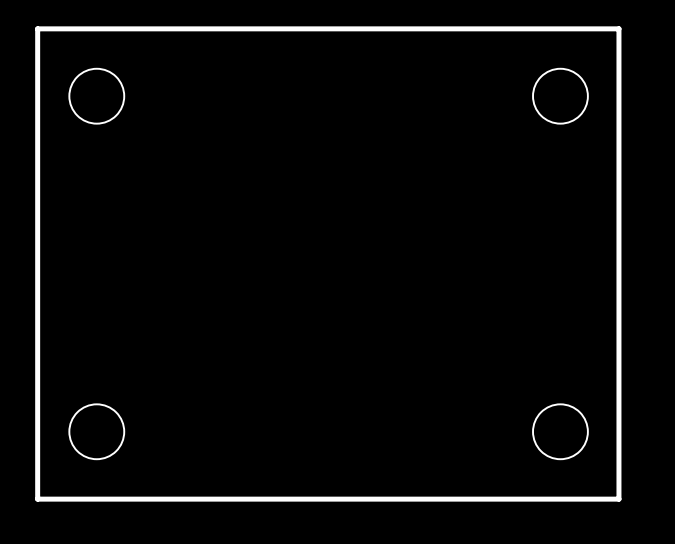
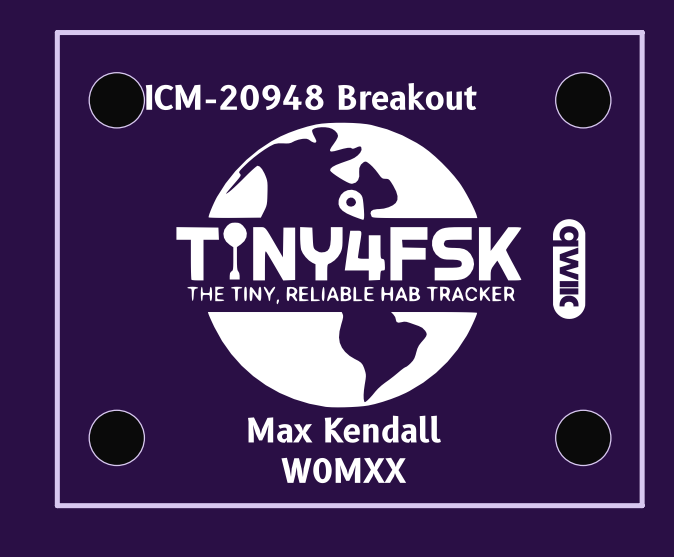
text: none -> ICM-20948 Breakout (311, 96)
drawing: none -> [176, 122, 522, 408]
drawing: none -> [552, 219, 586, 319]
text: none -> Max Kendall (344, 429)
text: none -> W0MXX (343, 470)

